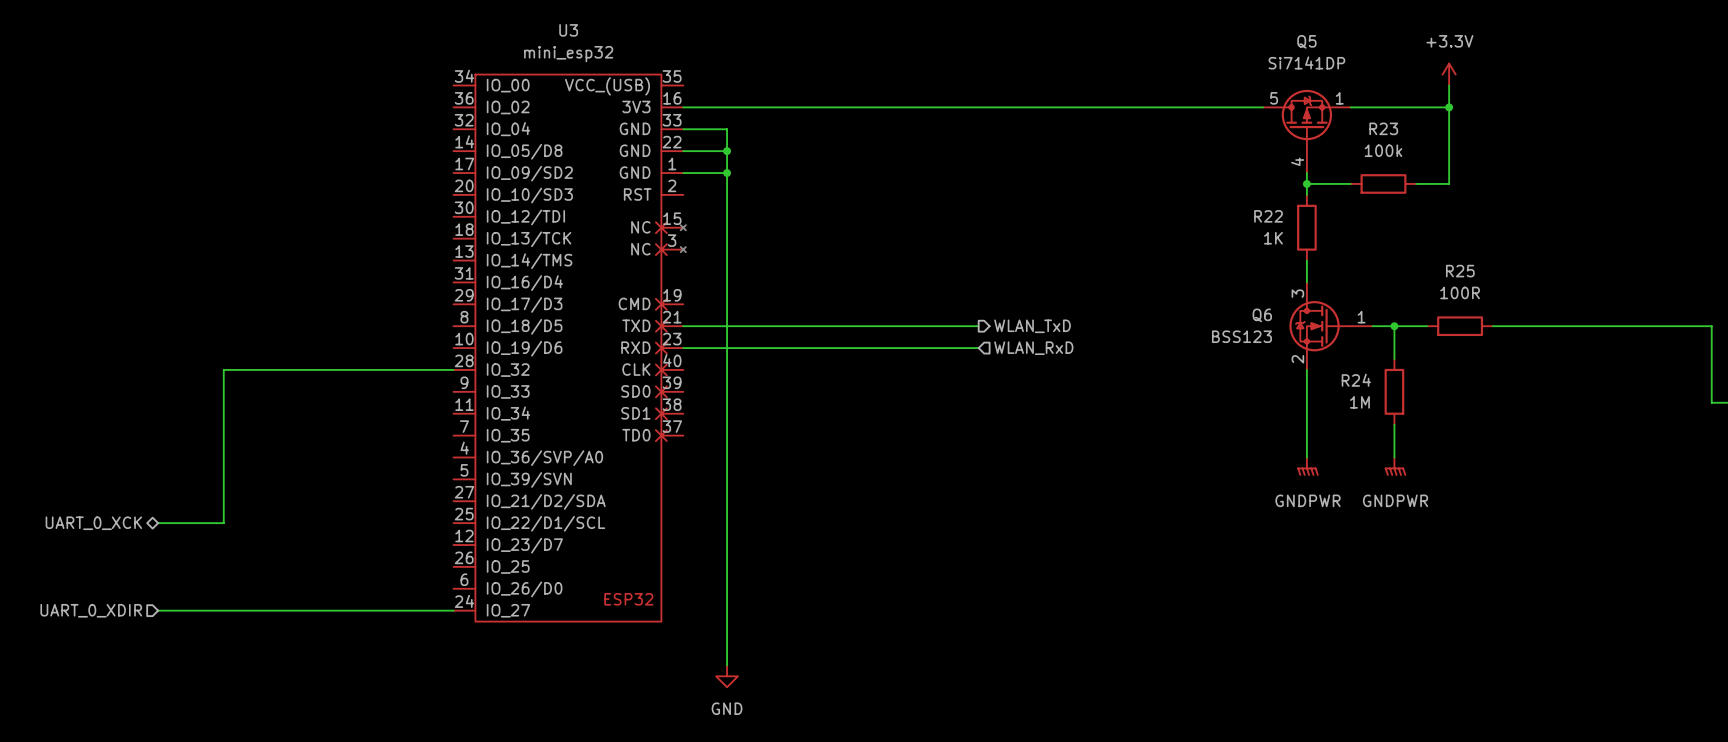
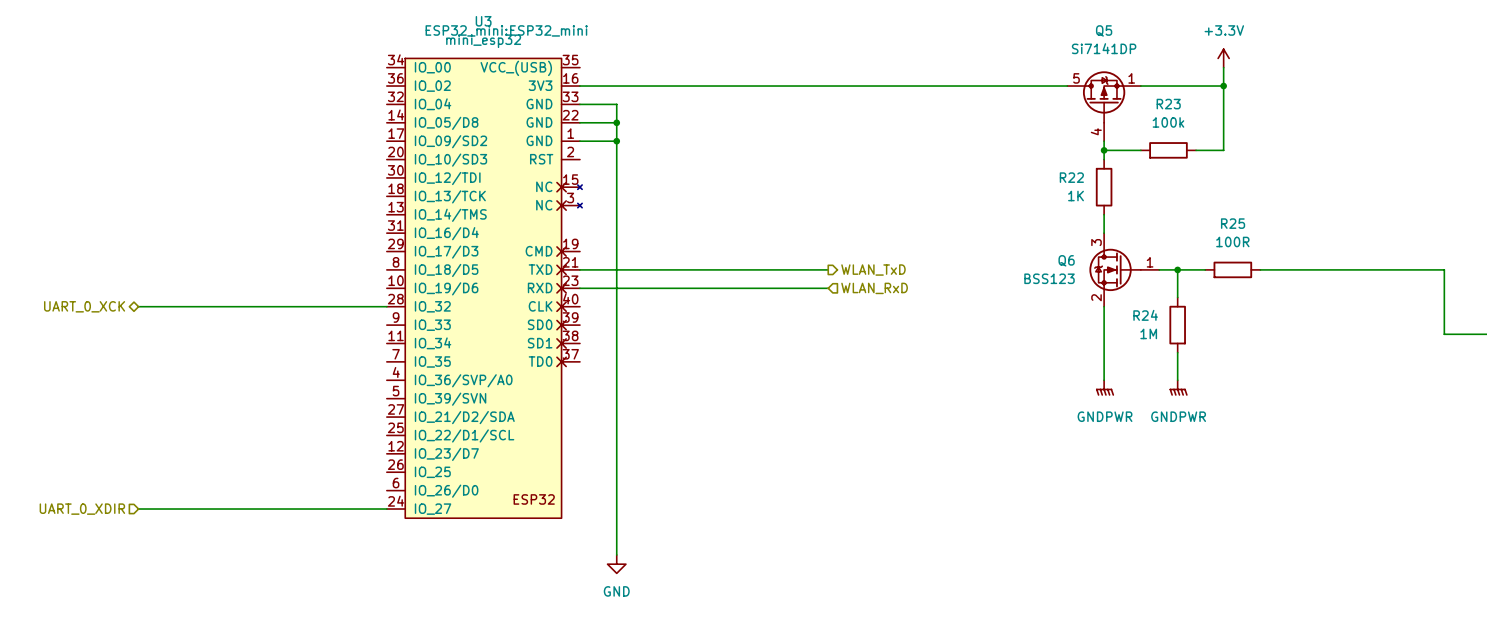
U3 text: none -> ESP32_mini:ESP32_mini (506, 30)
wire: (223, 369) (223, 523) (158, 523) -> (193, 306) (138, 306)
hierarchical label position: UART_0_XCK (93, 523) -> UART_0_XCK (84, 306)

